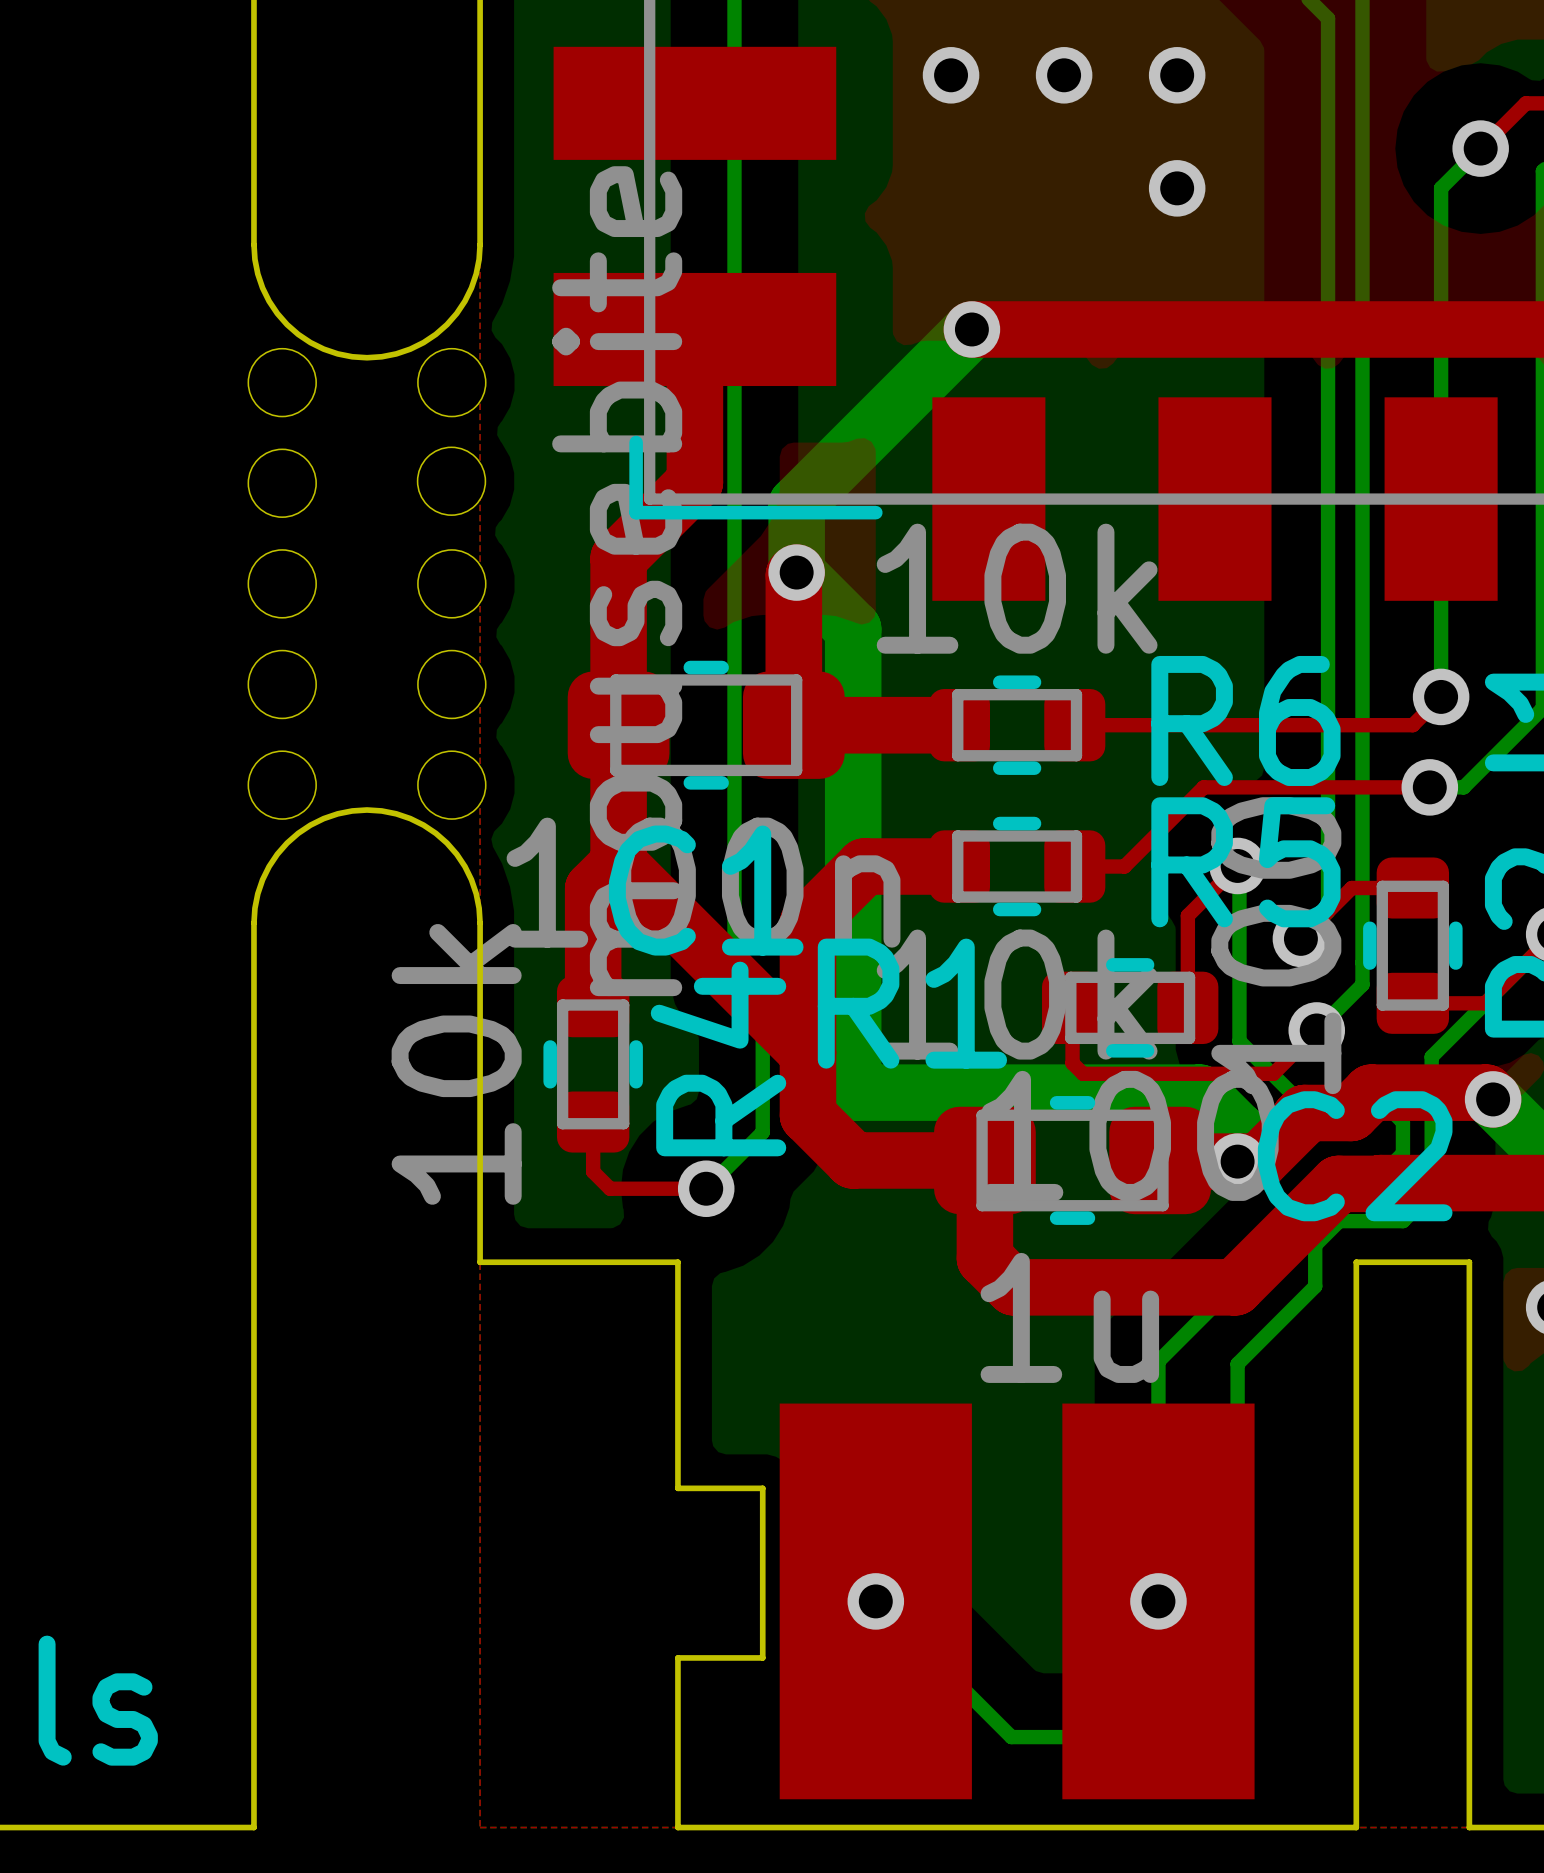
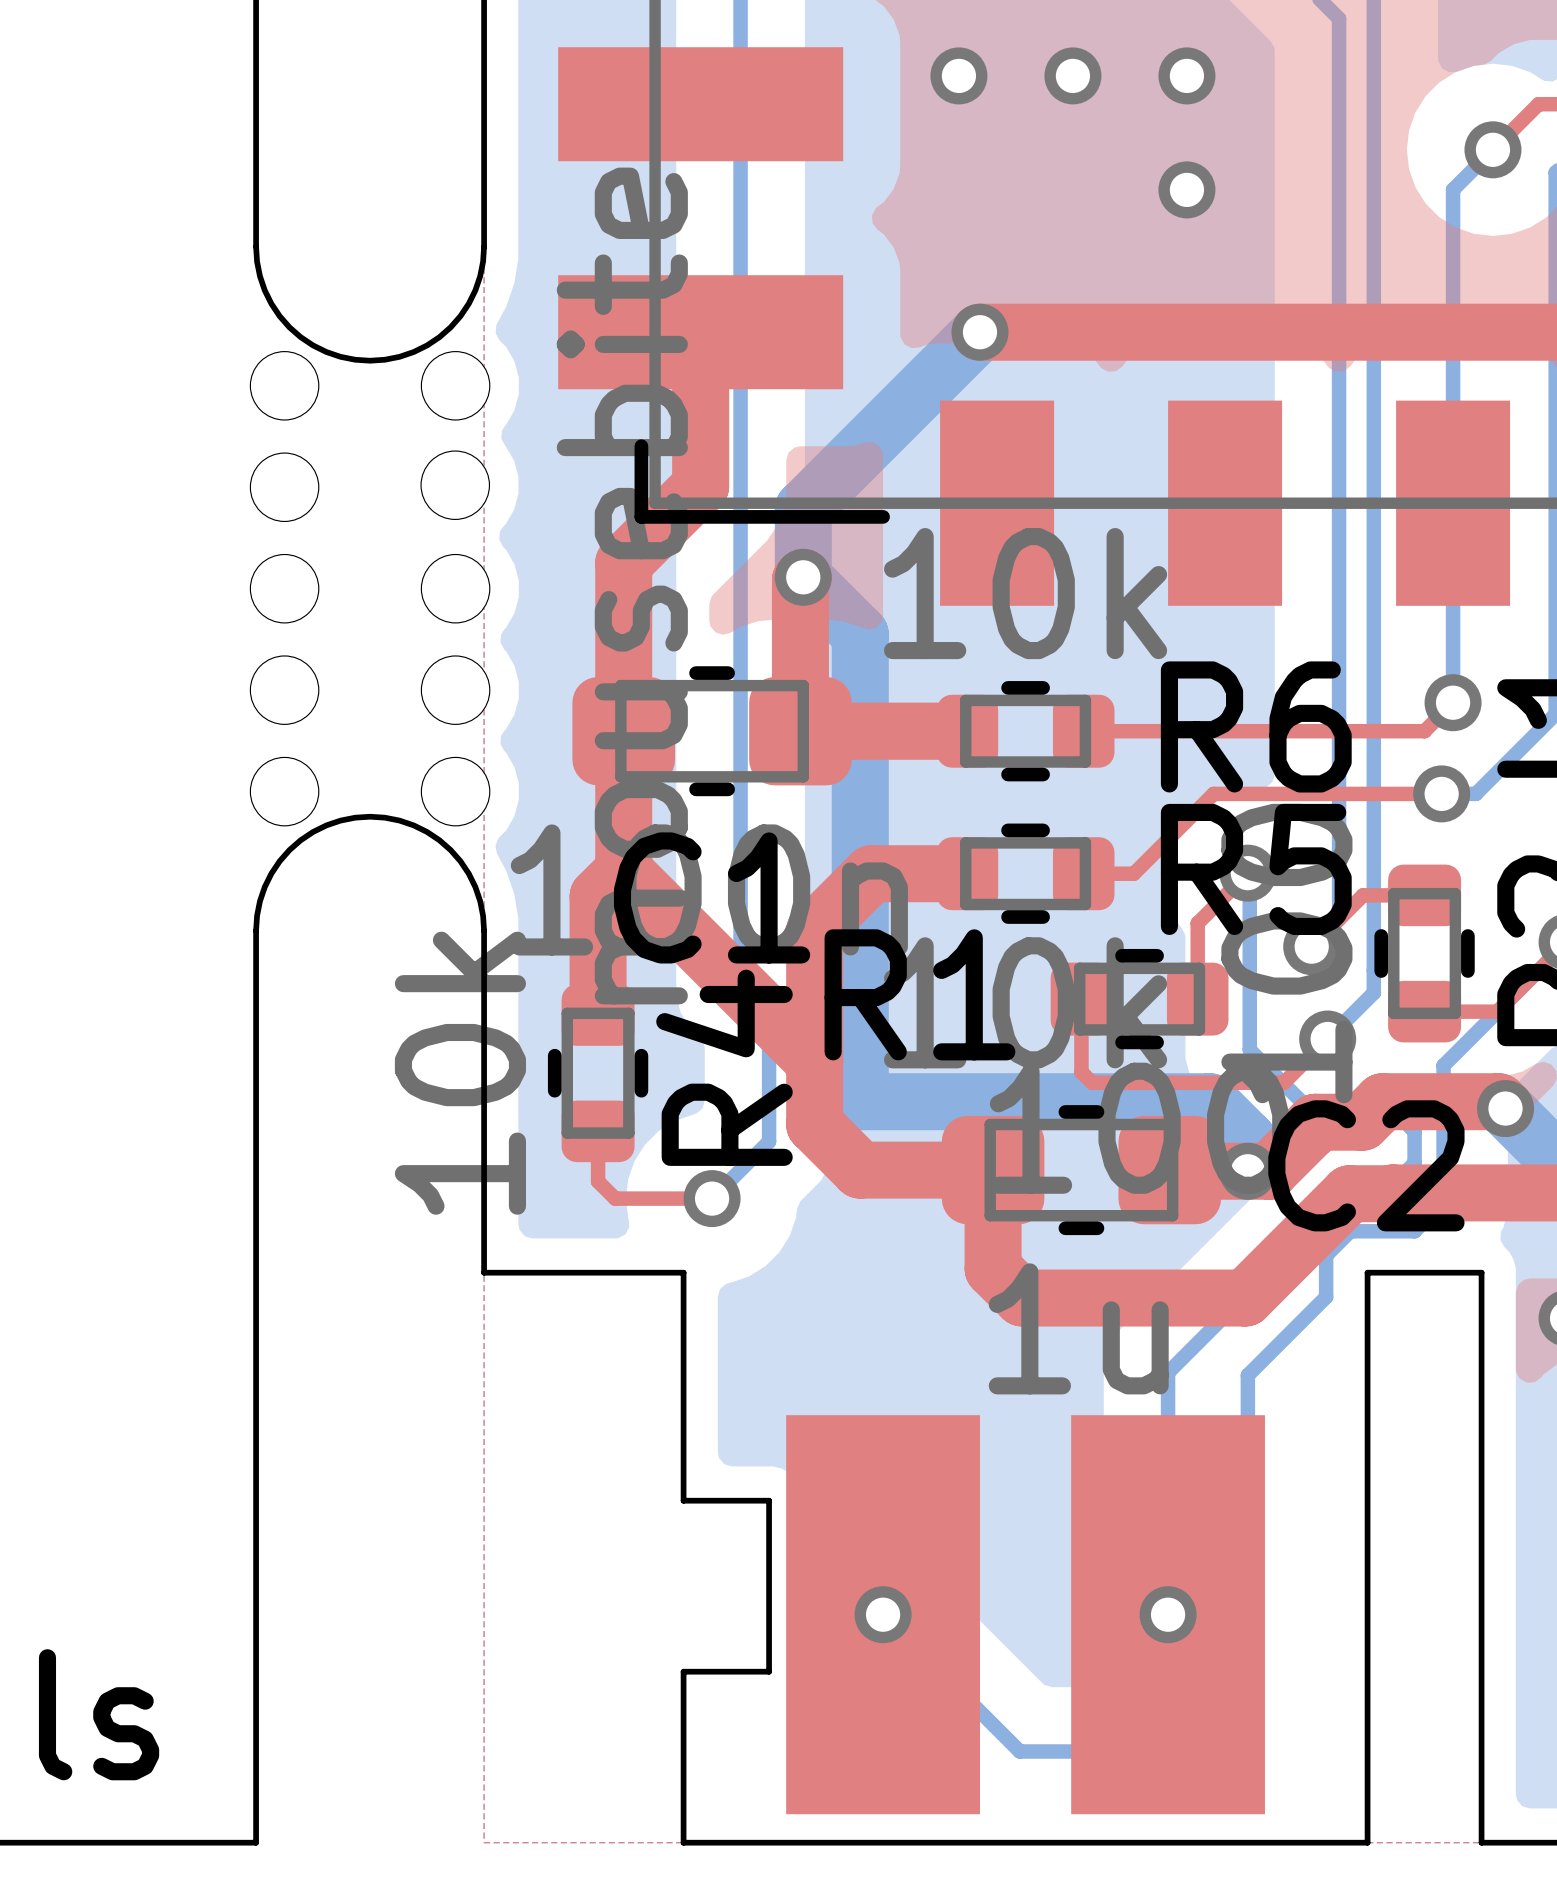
R1 position: (1130, 1007) -> (1139, 999)

